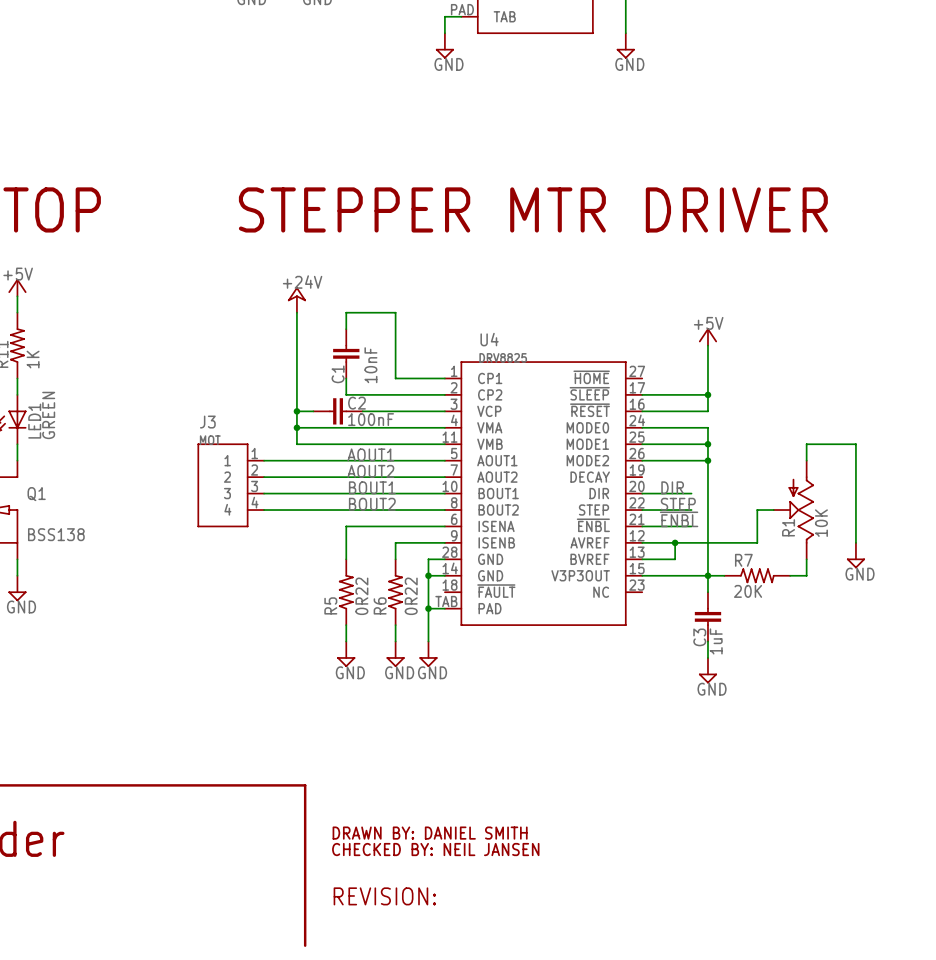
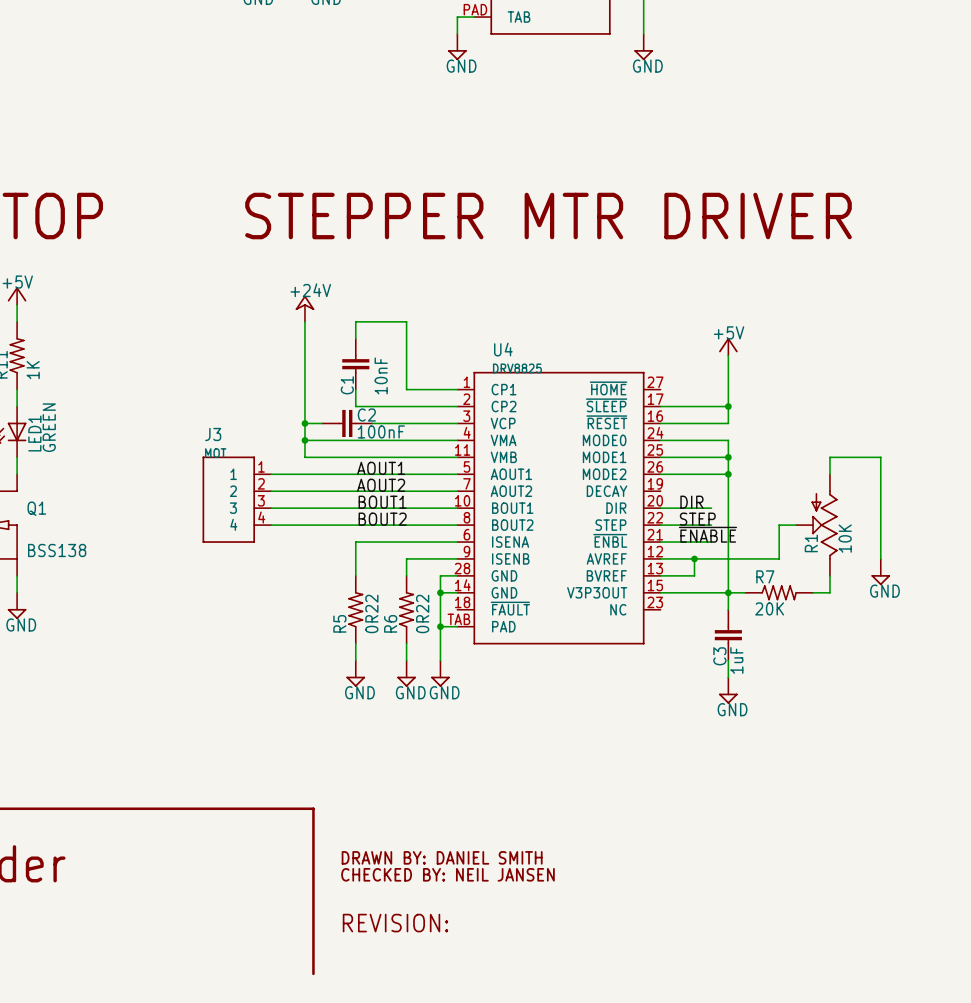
label: ~{ENBL} (679, 519) -> ~{ENABLE} (707, 534)

